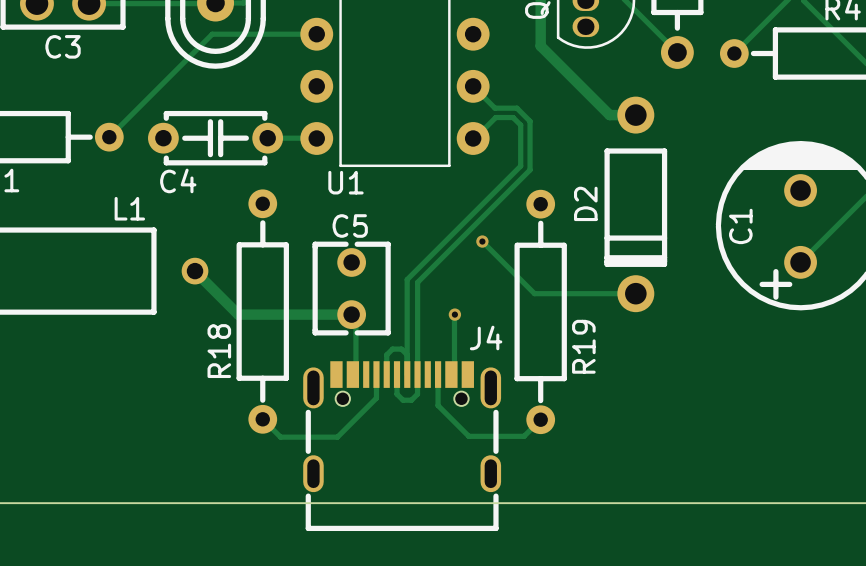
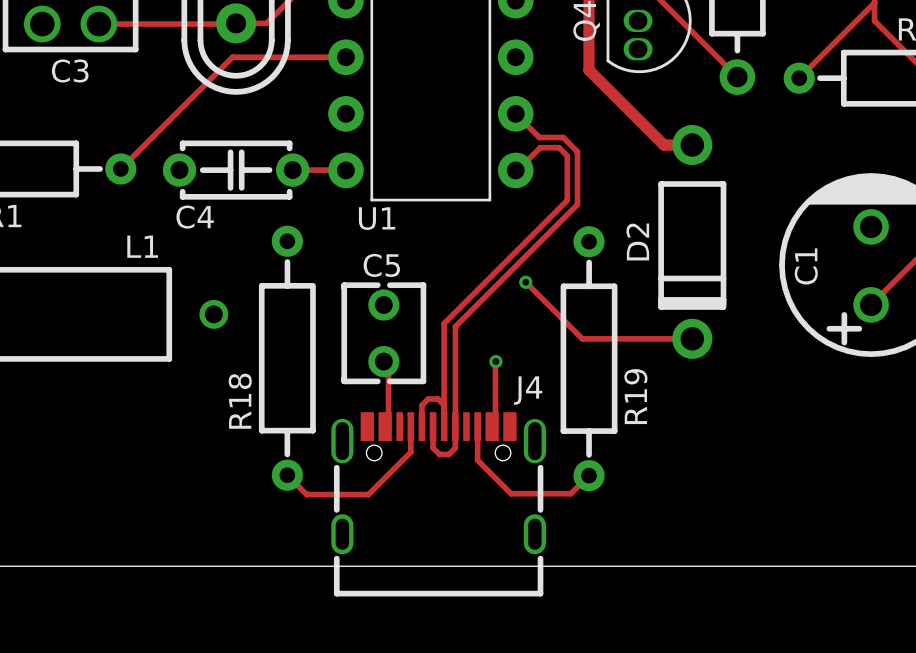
track: (195, 271) (238, 314) (351, 314) -> none

